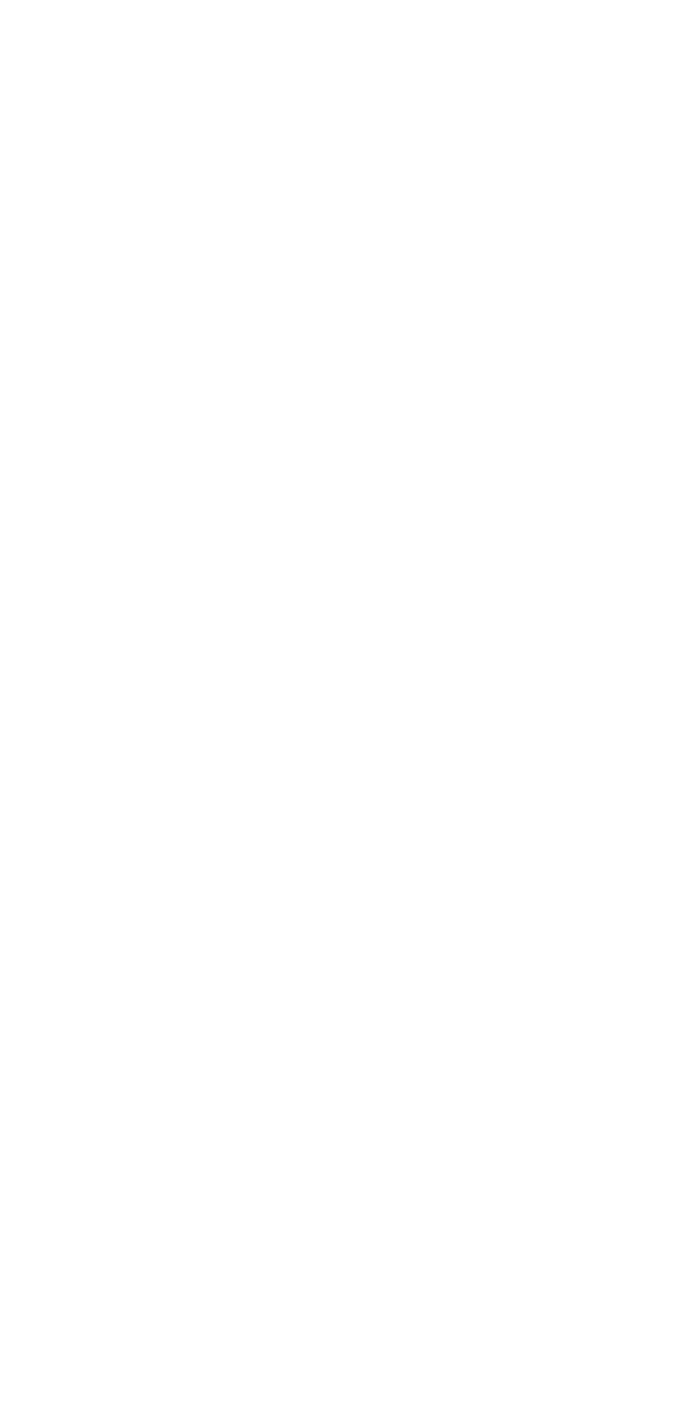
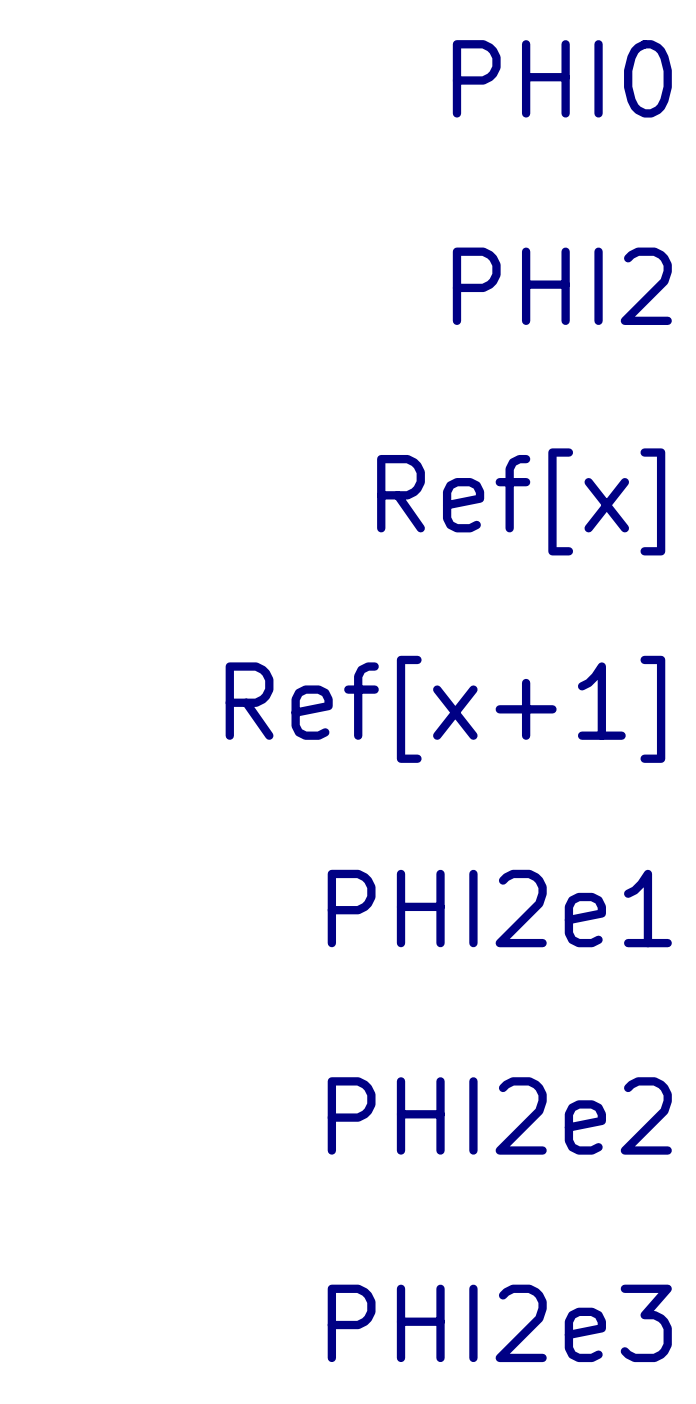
text: none -> PHI0 (562, 78)
text: none -> PHI2 (562, 286)
text: none -> Ref[x] (521, 501)
text: none -> Ref[x+1] (445, 709)
text: none -> PHI2e1 (499, 908)
text: none -> PHI2e2 (499, 1115)
text: none -> PHI2e3 (499, 1323)

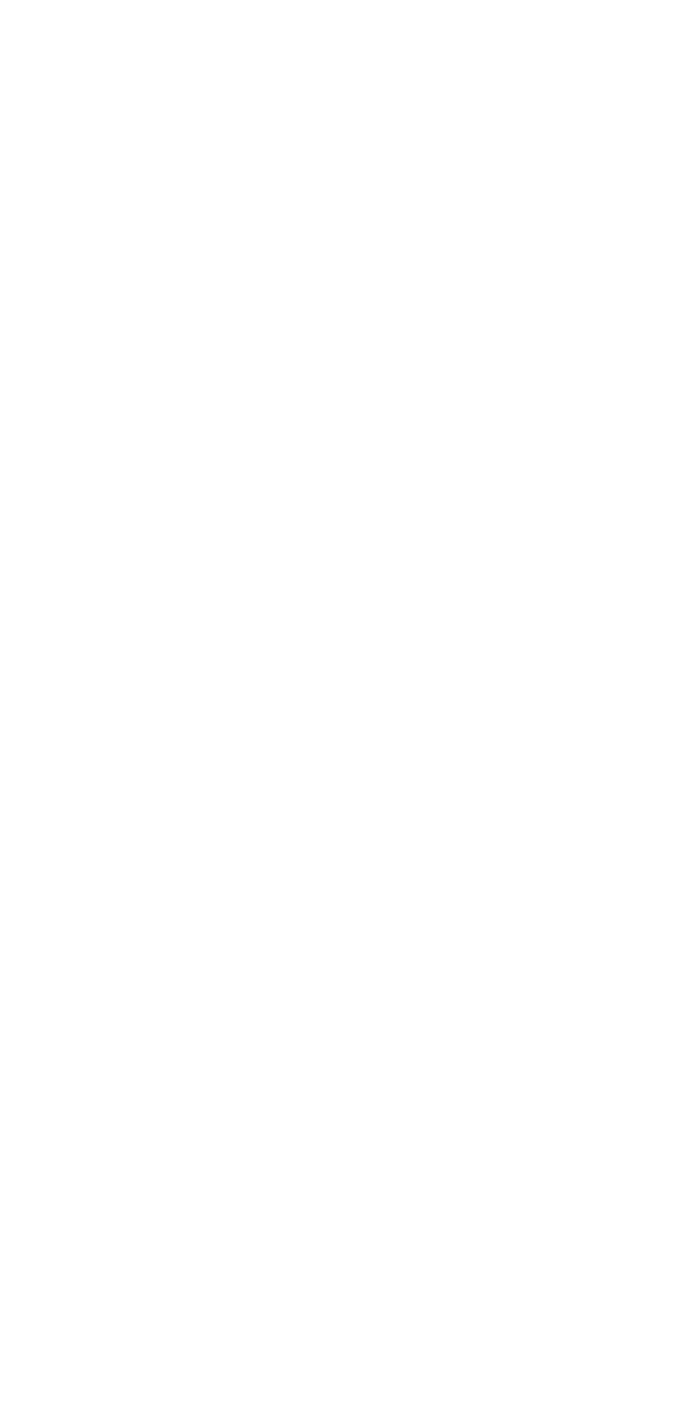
text: PHI0 (562, 78) -> none
text: PHI2 (562, 286) -> none
text: Ref[x] (521, 501) -> none
text: Ref[x+1] (445, 709) -> none
text: PHI2e1 (499, 908) -> none
text: PHI2e2 (499, 1115) -> none
text: PHI2e3 (499, 1323) -> none

